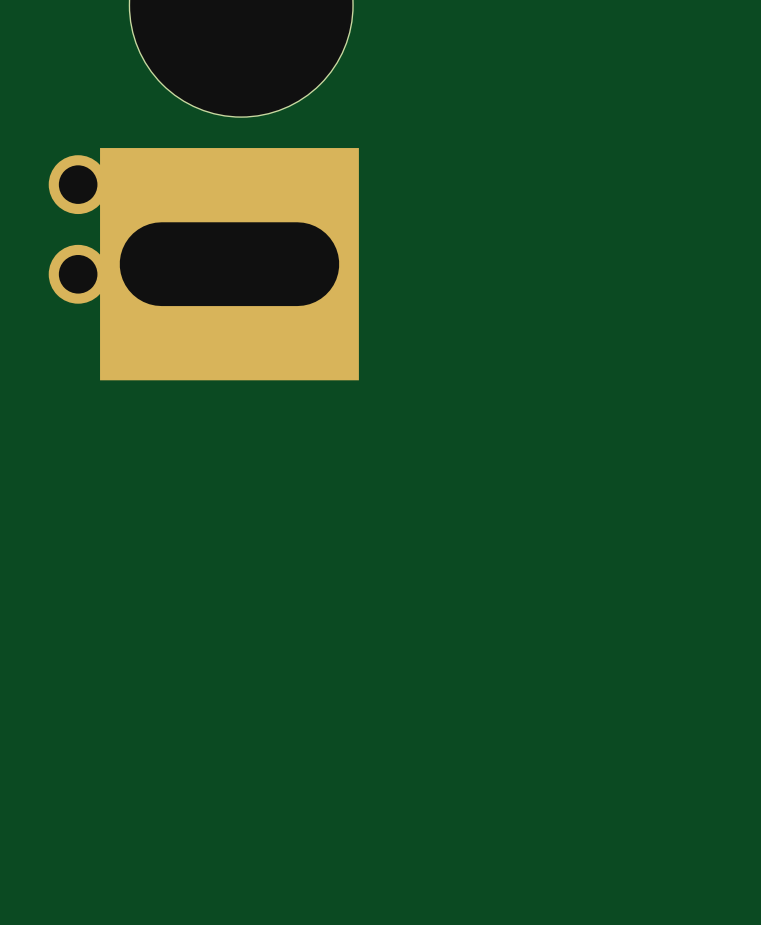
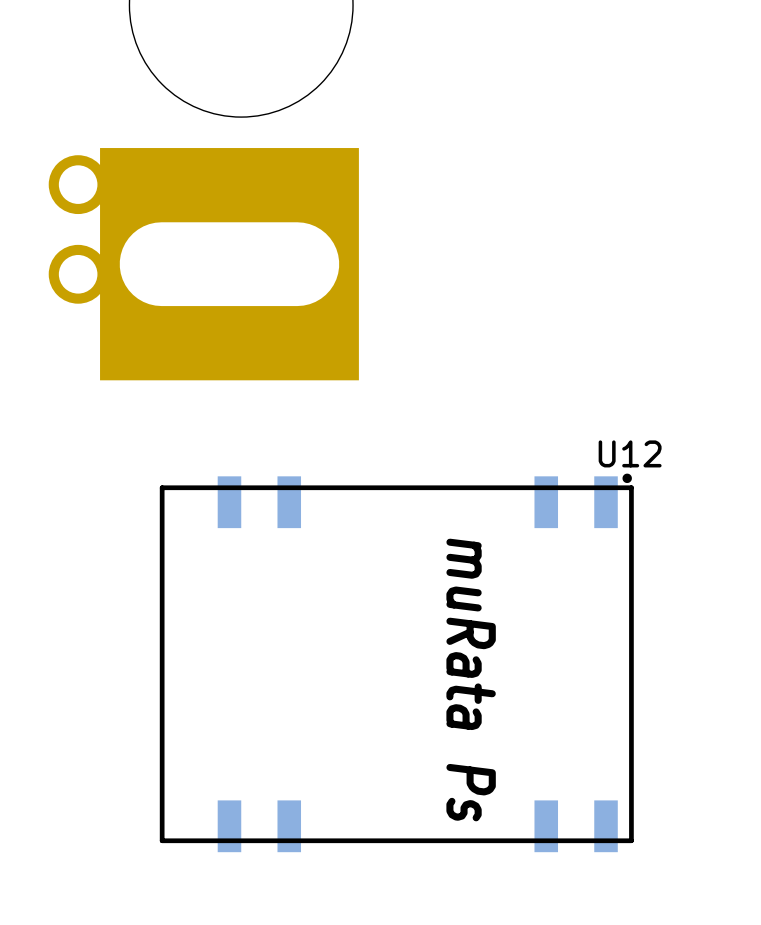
U12: none -> (396, 662)

